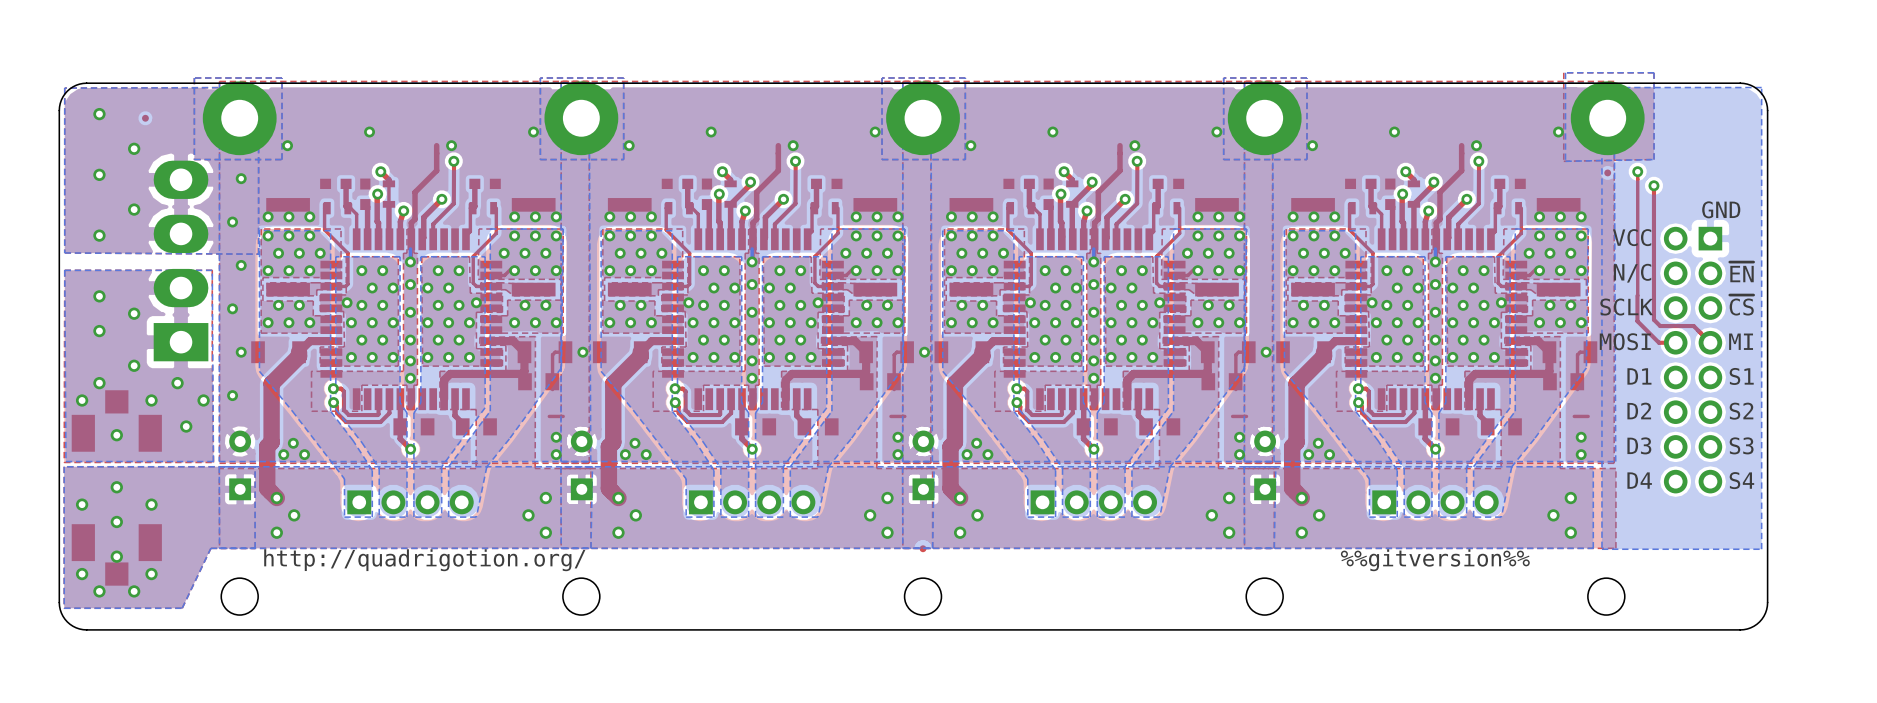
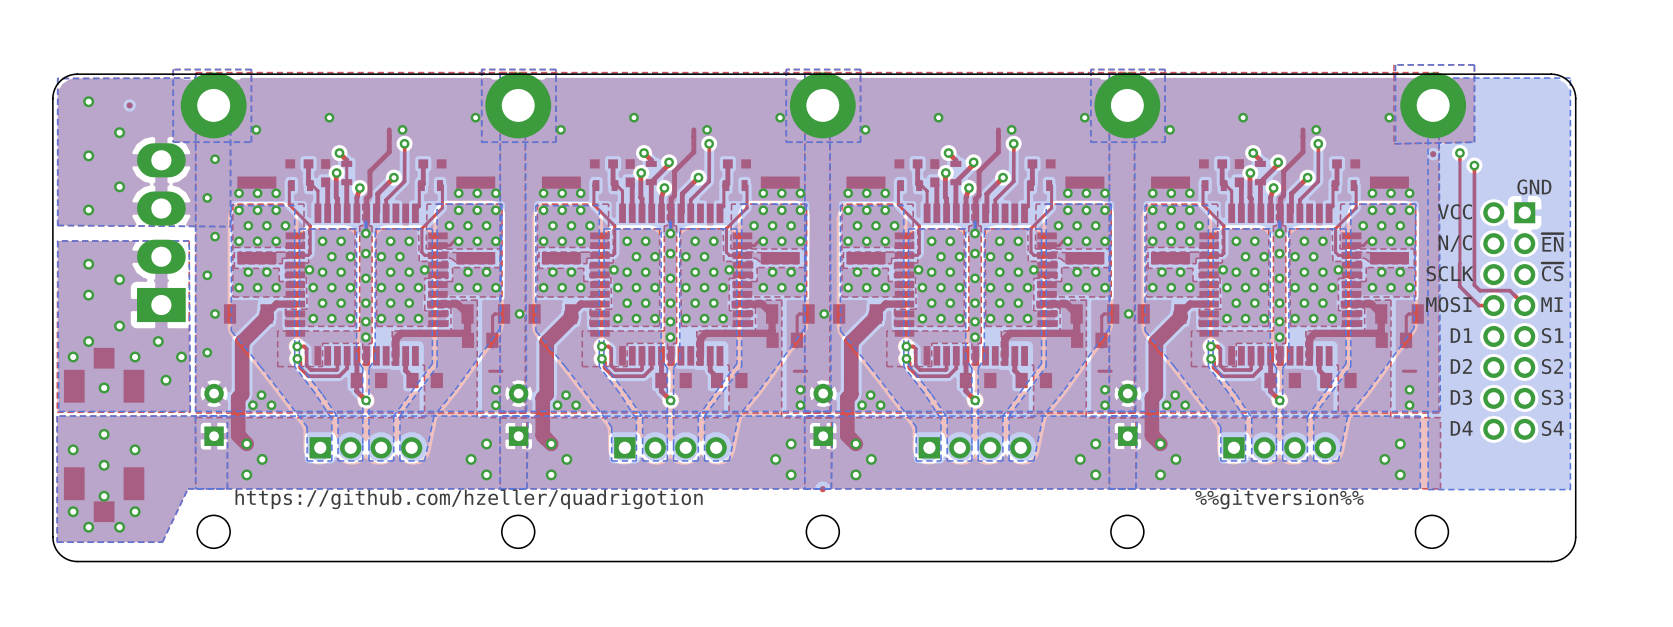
text: http://quadrigotion.org/ (424, 560) -> https://github.com/hzeller/quadrigotion (469, 499)

